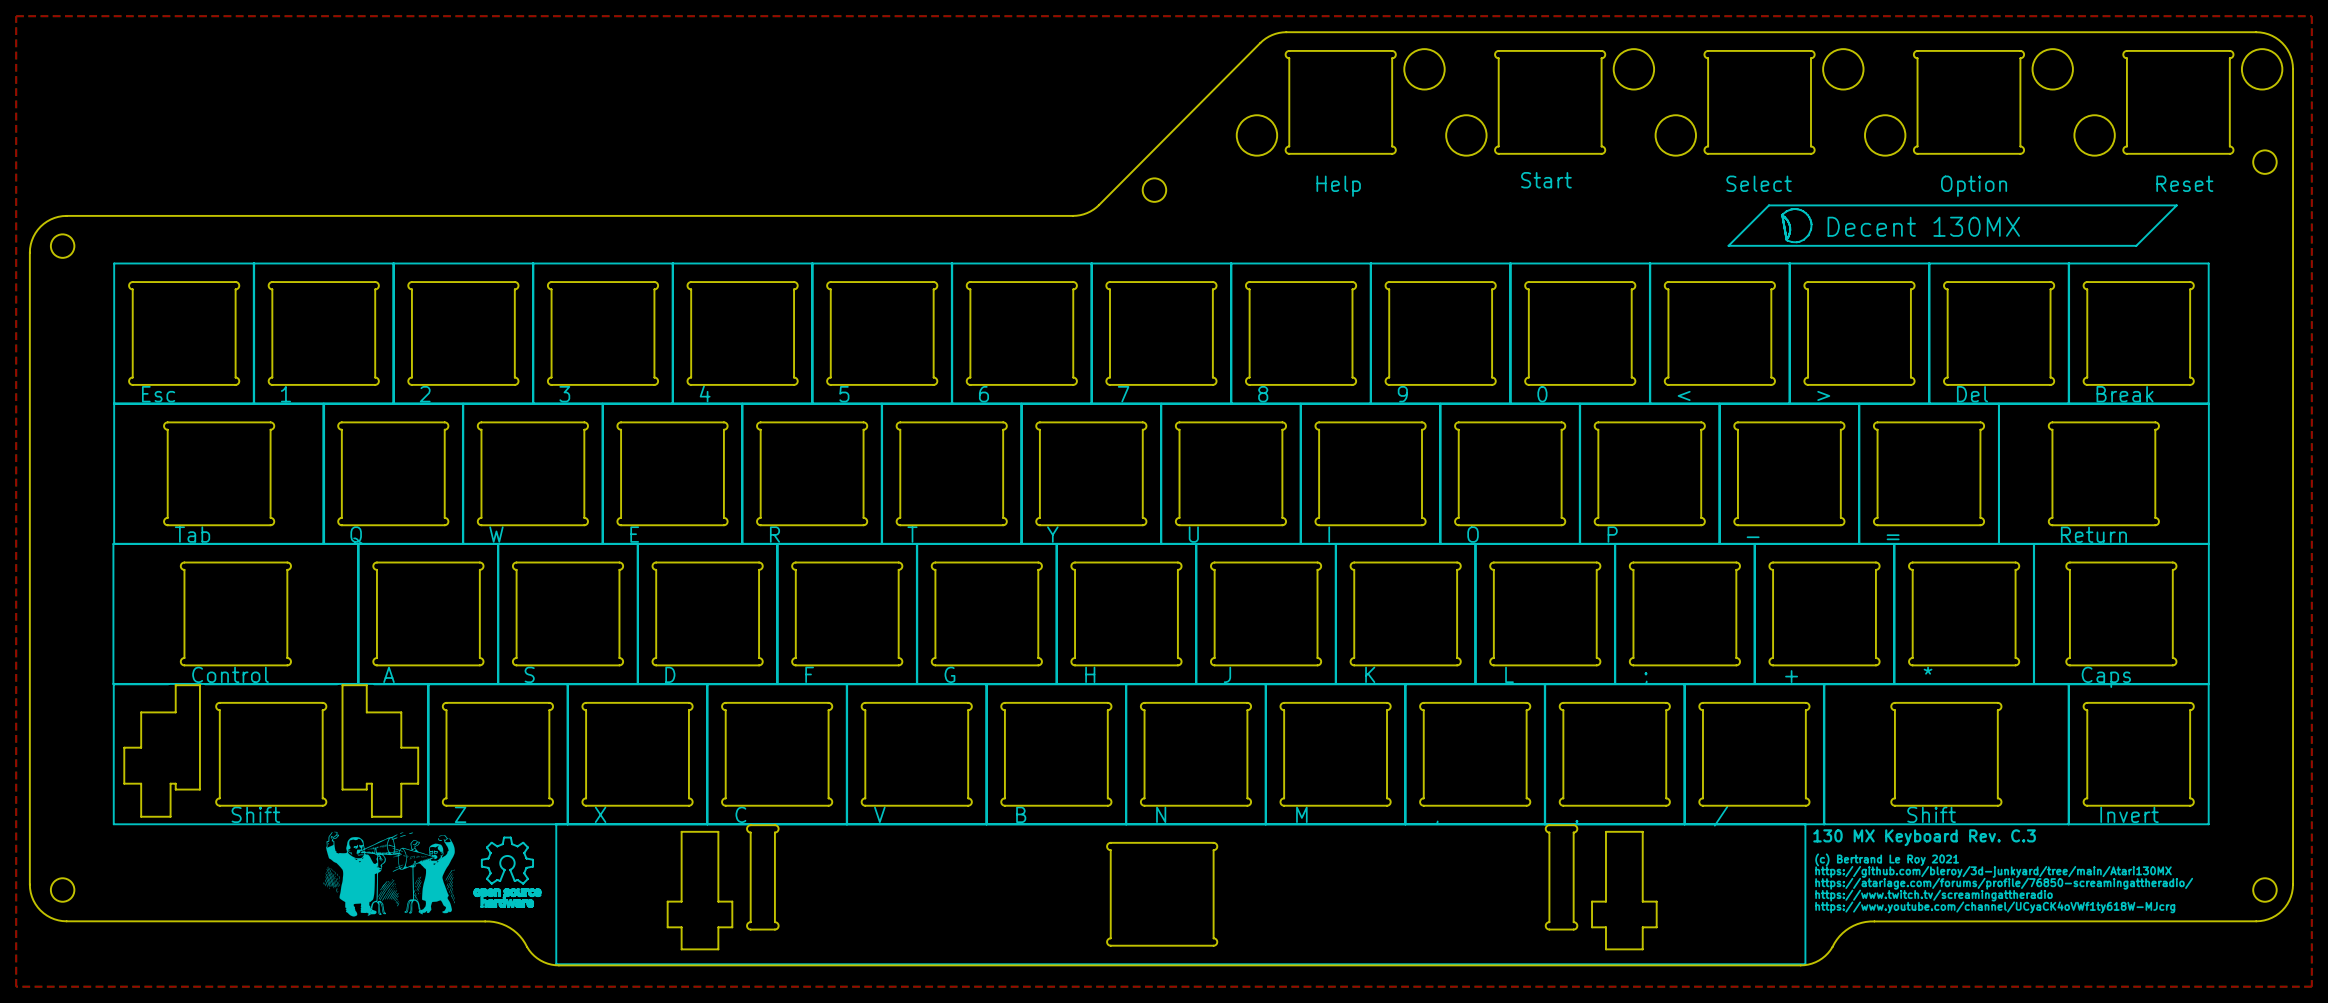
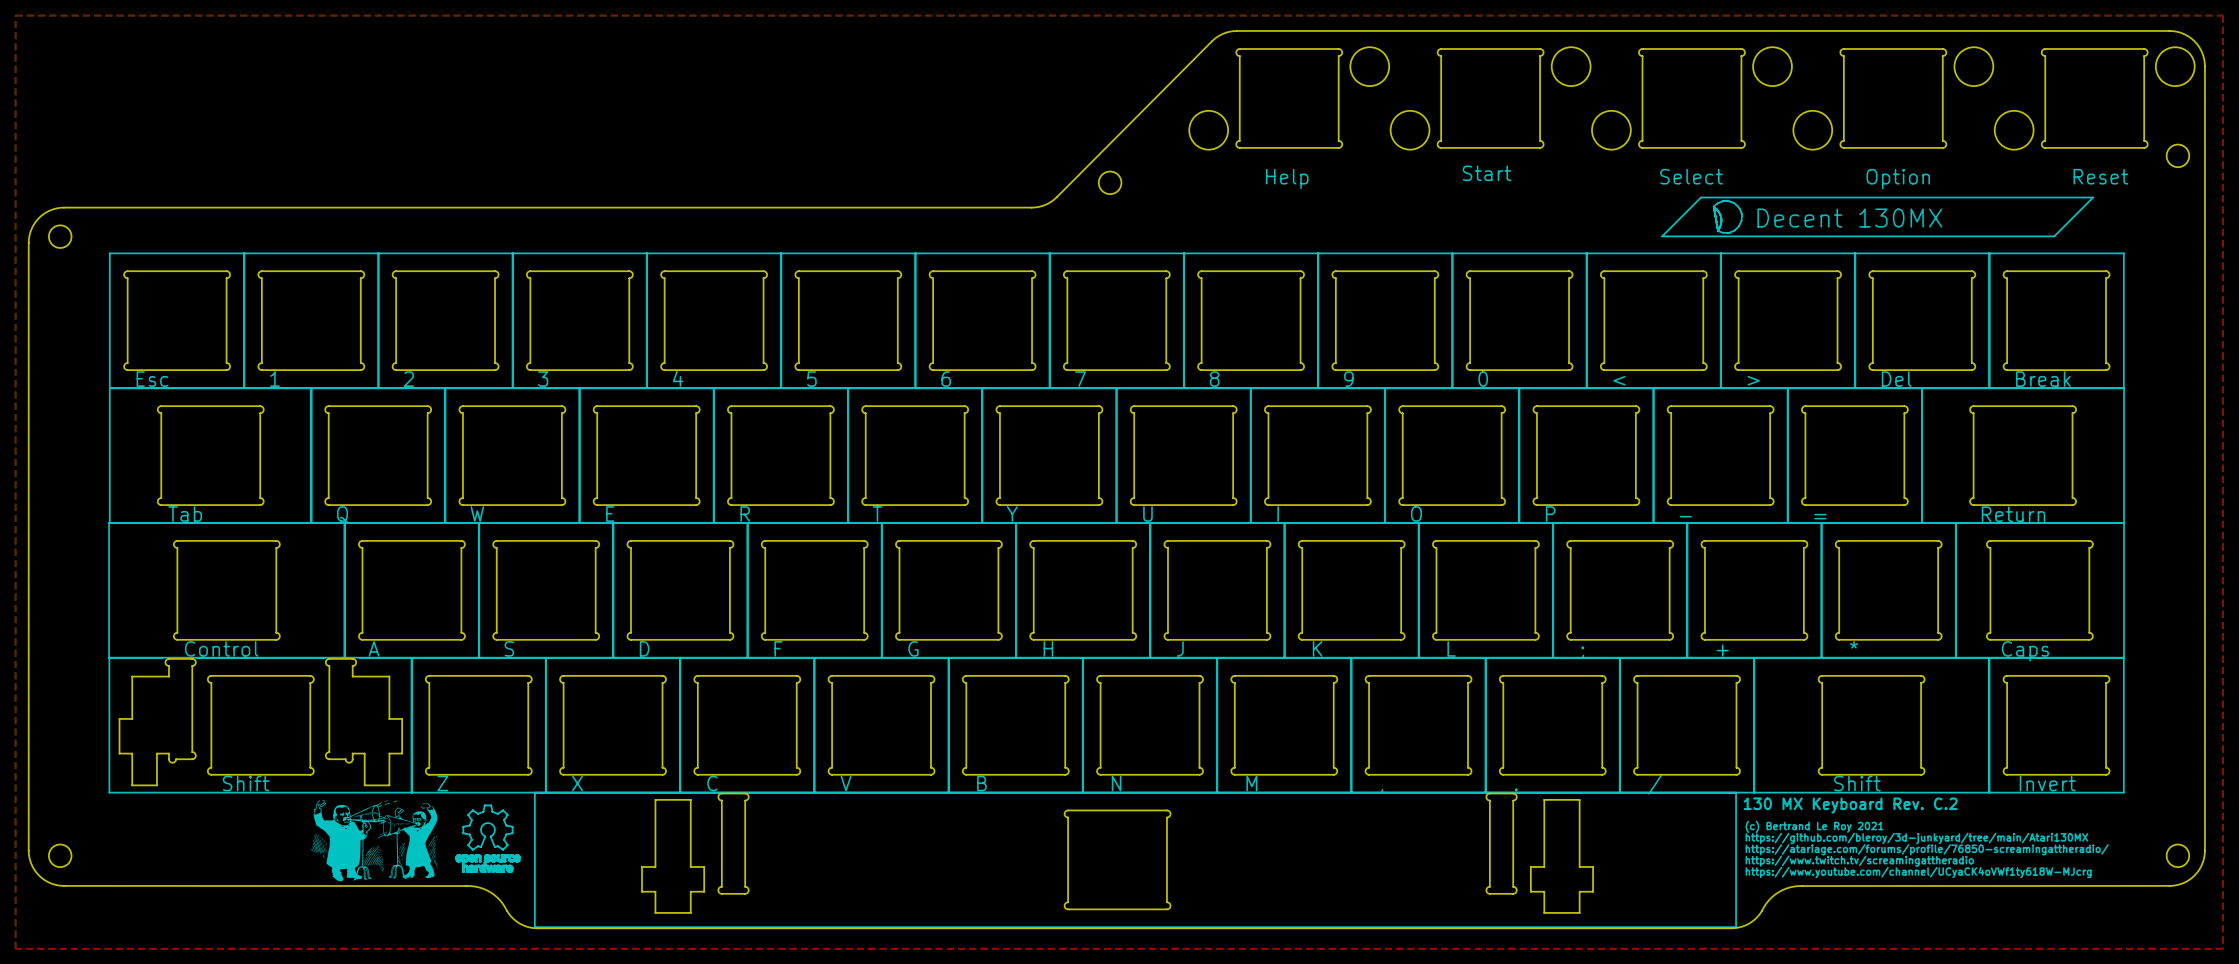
drawing shape: [113, 683, 430, 825] -> [108, 657, 413, 794]
text: 130 MX Keyboard Rev. C.3 (1924, 837) -> 130 MX Keyboard Rev. C.2 (1850, 805)

